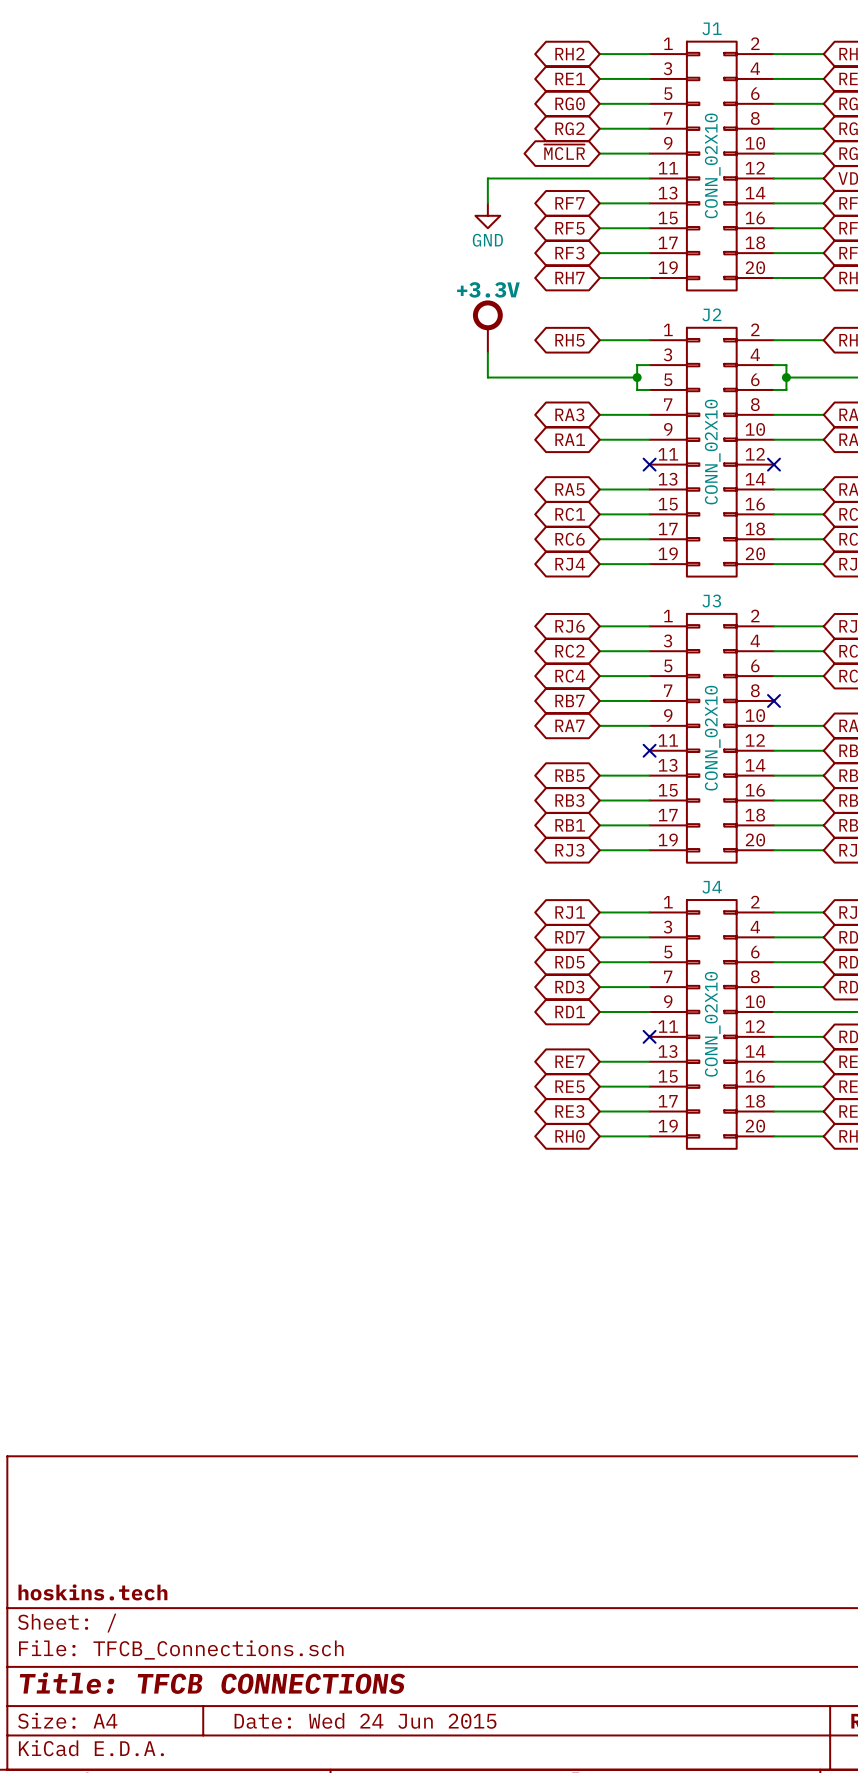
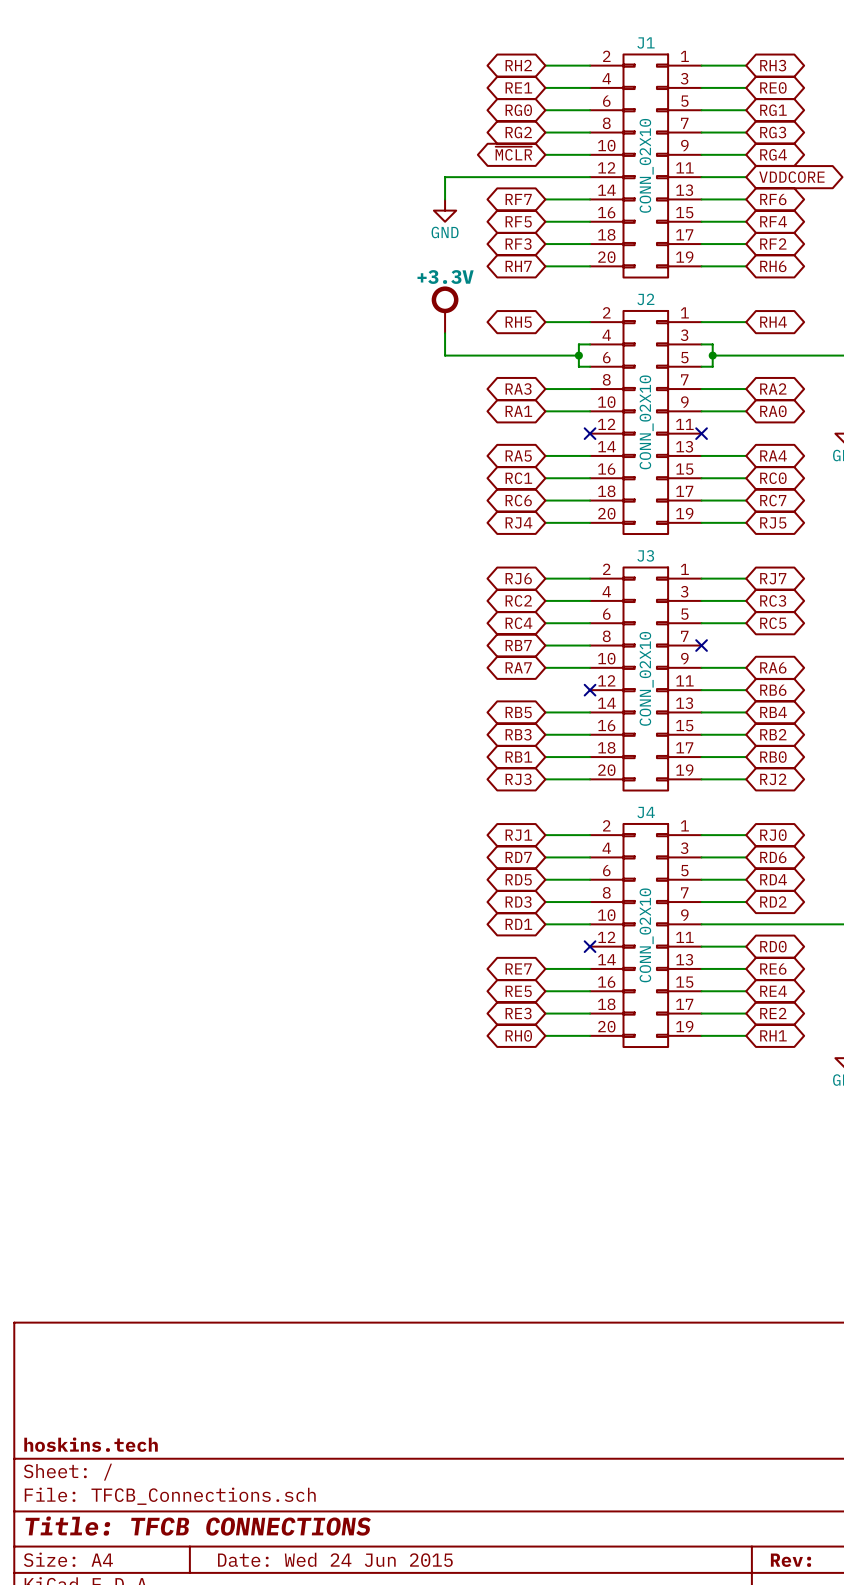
J1 flip: as is (711, 166) -> left-right (645, 165)
J2 flip: as is (711, 452) -> left-right (645, 422)
J3 flip: as is (711, 738) -> left-right (645, 678)
J4 flip: as is (711, 1024) -> left-right (645, 935)

